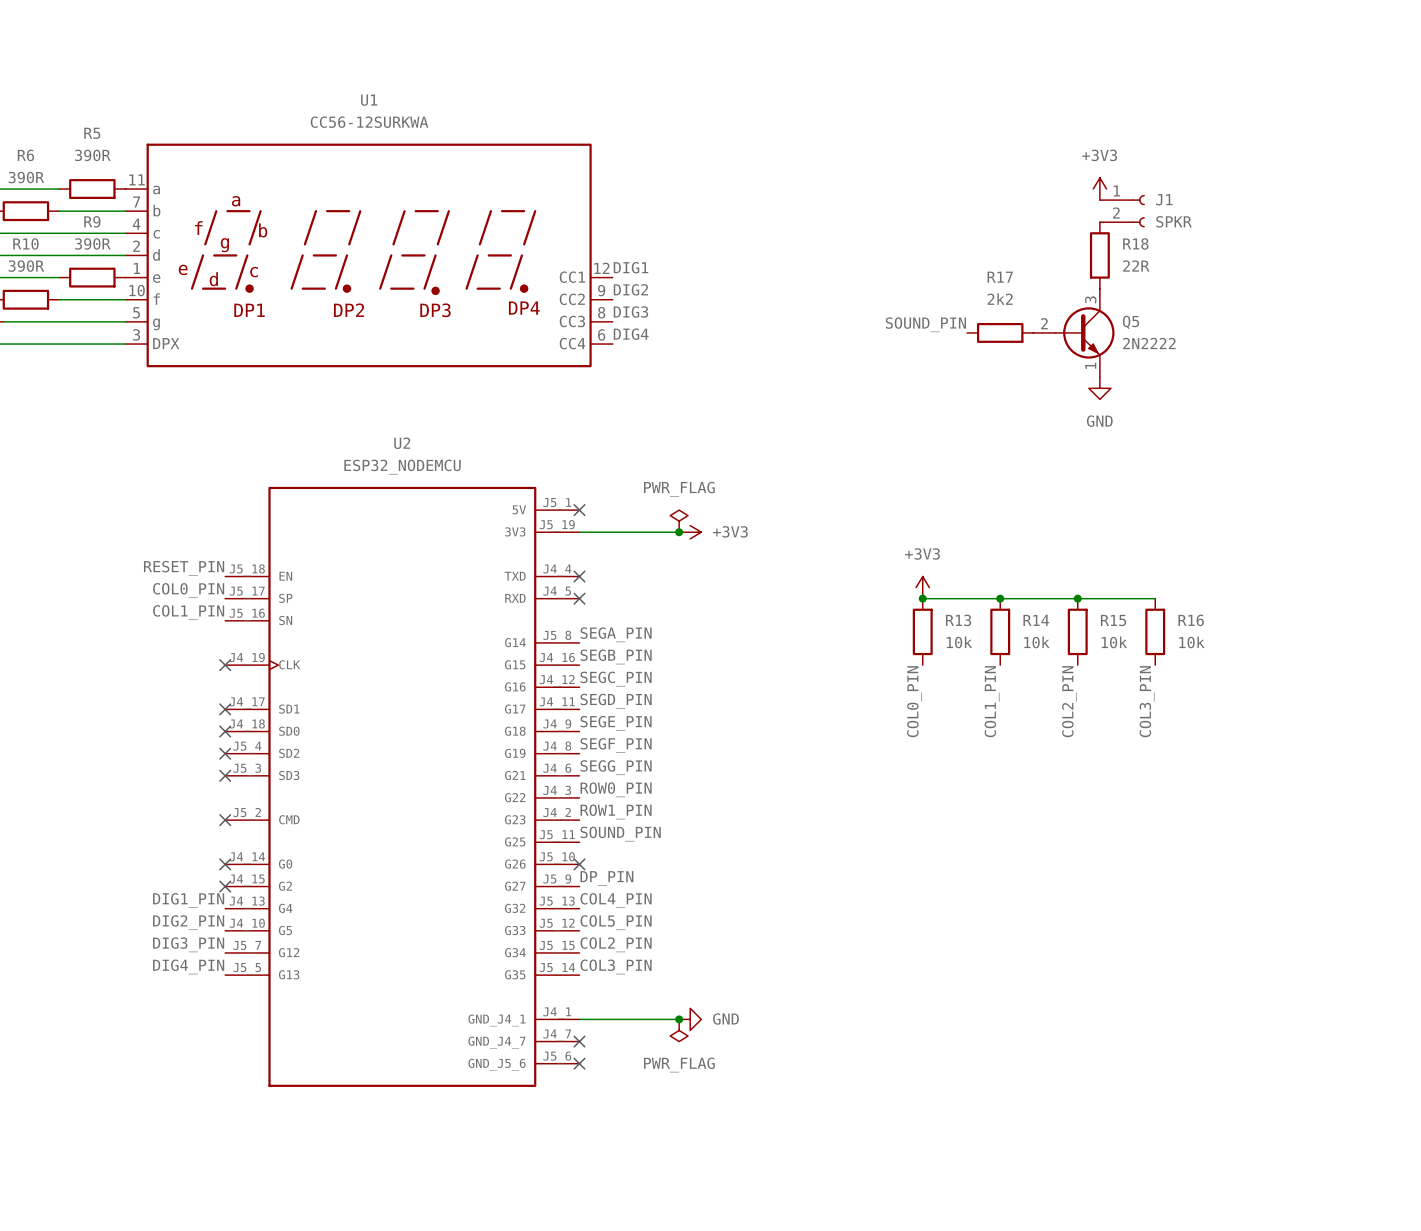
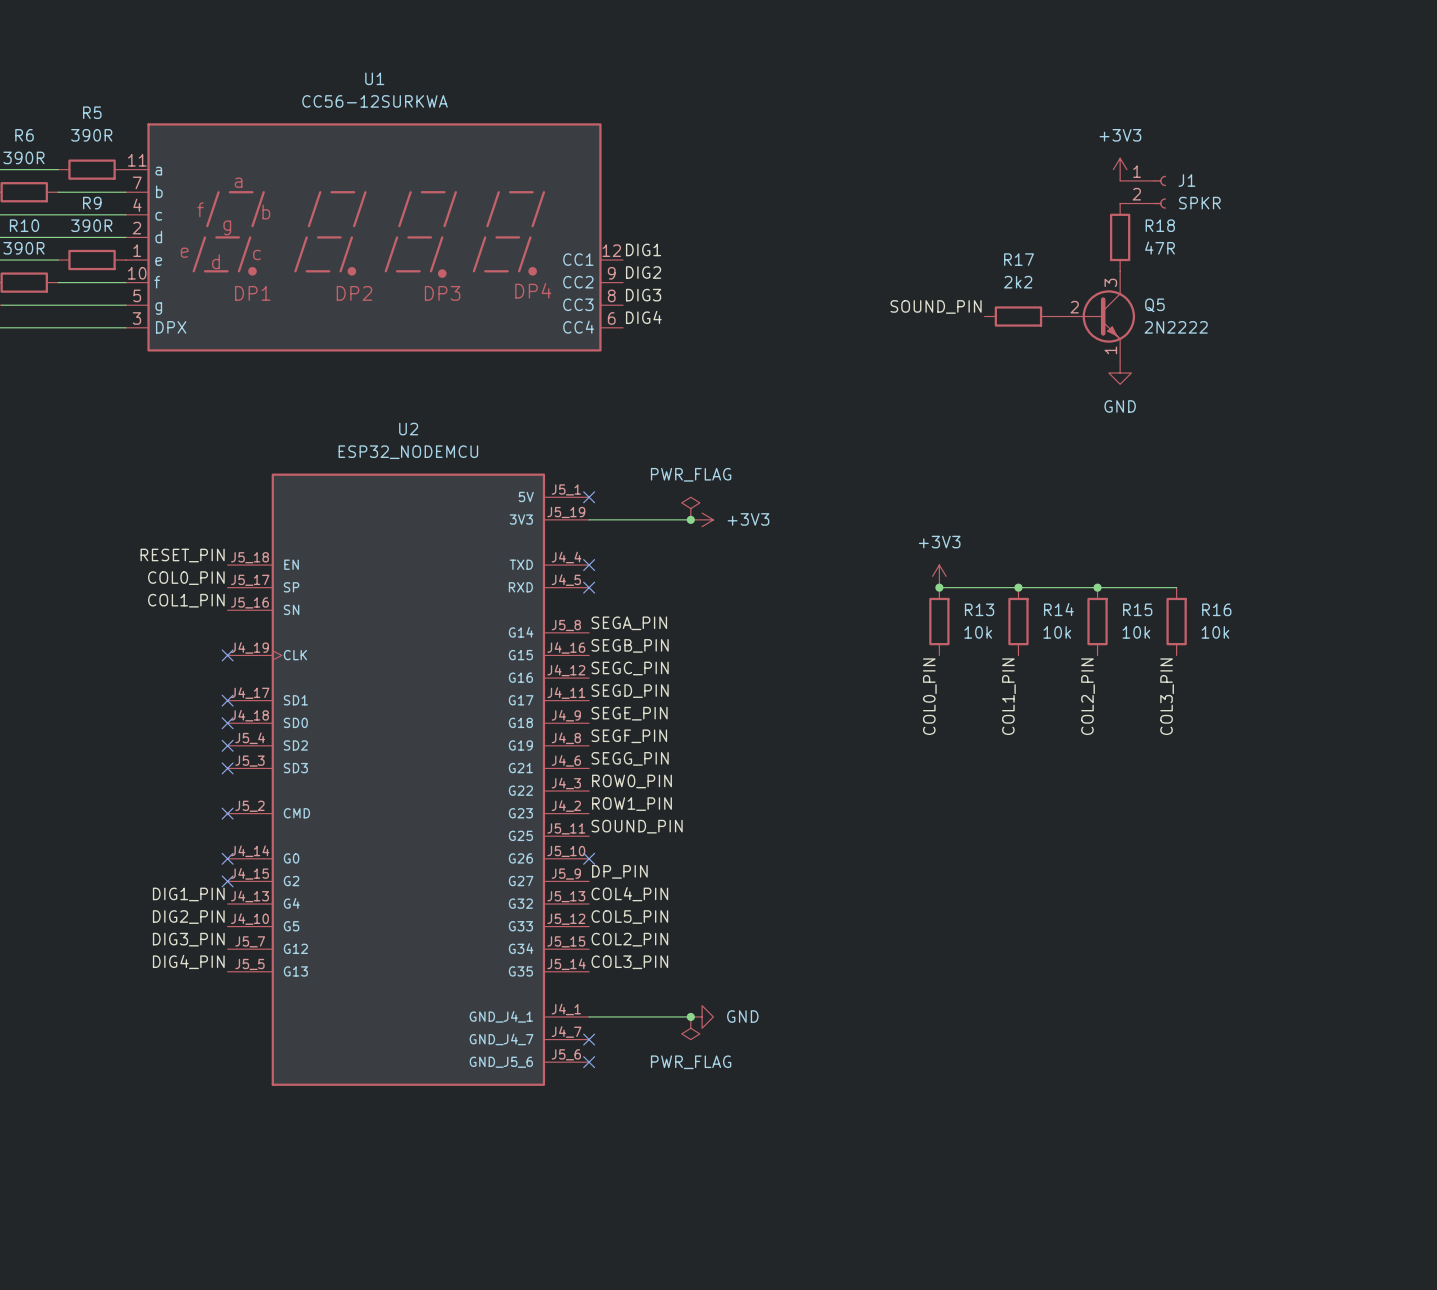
R18 value: 22R (1136, 266) -> 47R (1160, 248)
Q5 symbol: [1033, 288, 1115, 378] -> [1052, 271, 1136, 362]

